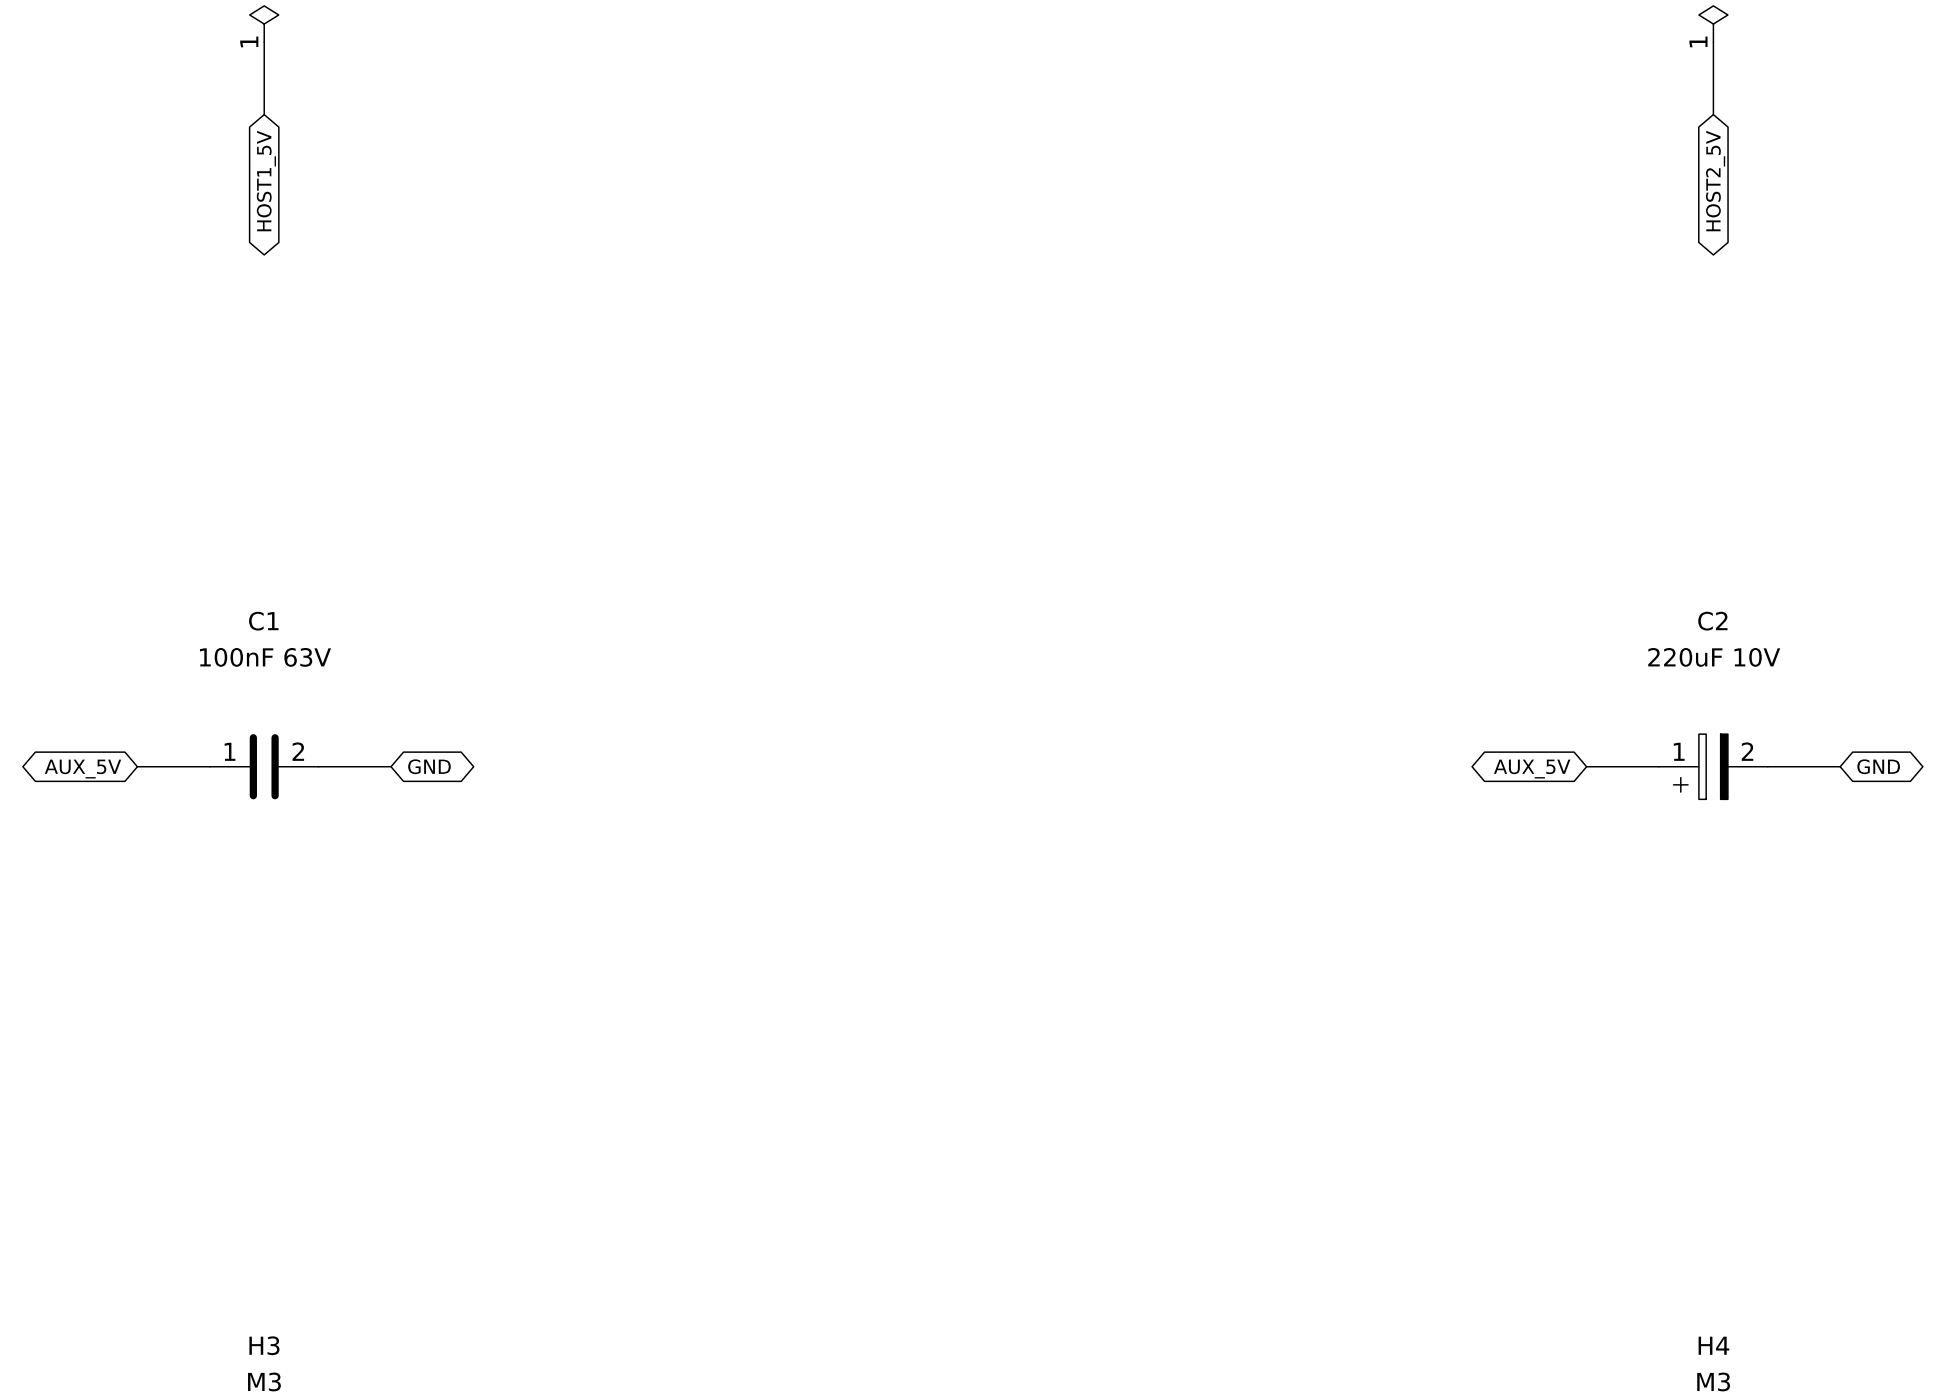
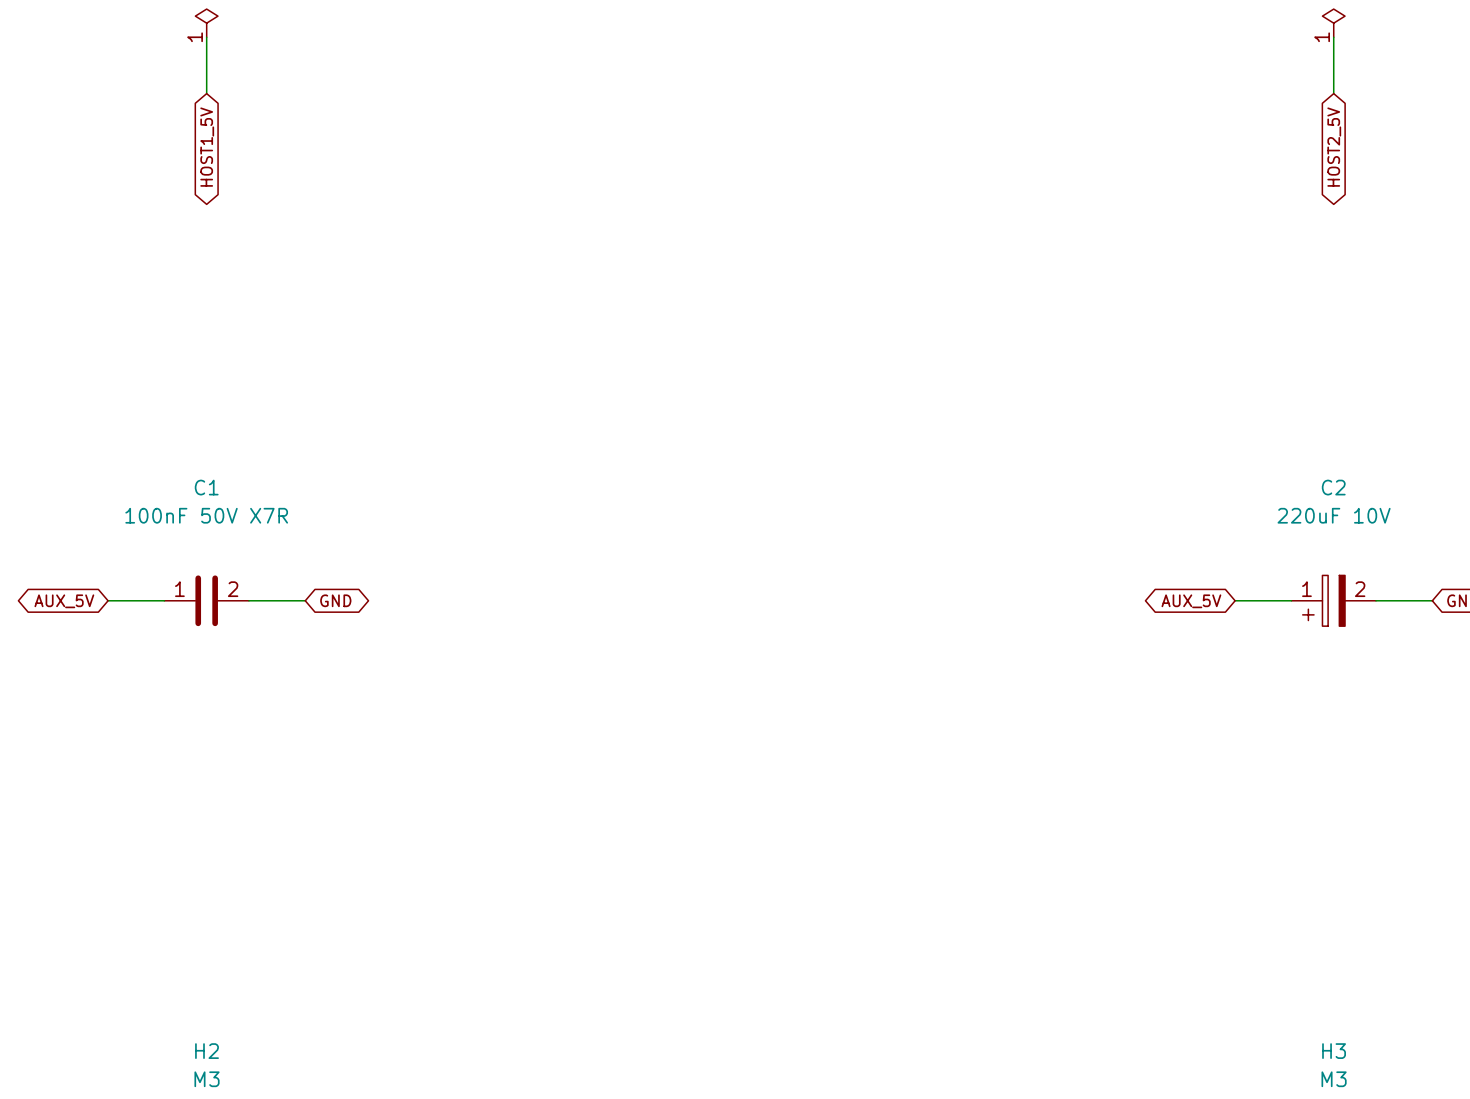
C1 value: 100nF 63V (265, 657) -> 100nF 50V X7R (206, 515)
H3 name: H3 (264, 1345) -> H2 (207, 1051)
H4 name: H4 (1713, 1345) -> H3 (1334, 1051)

